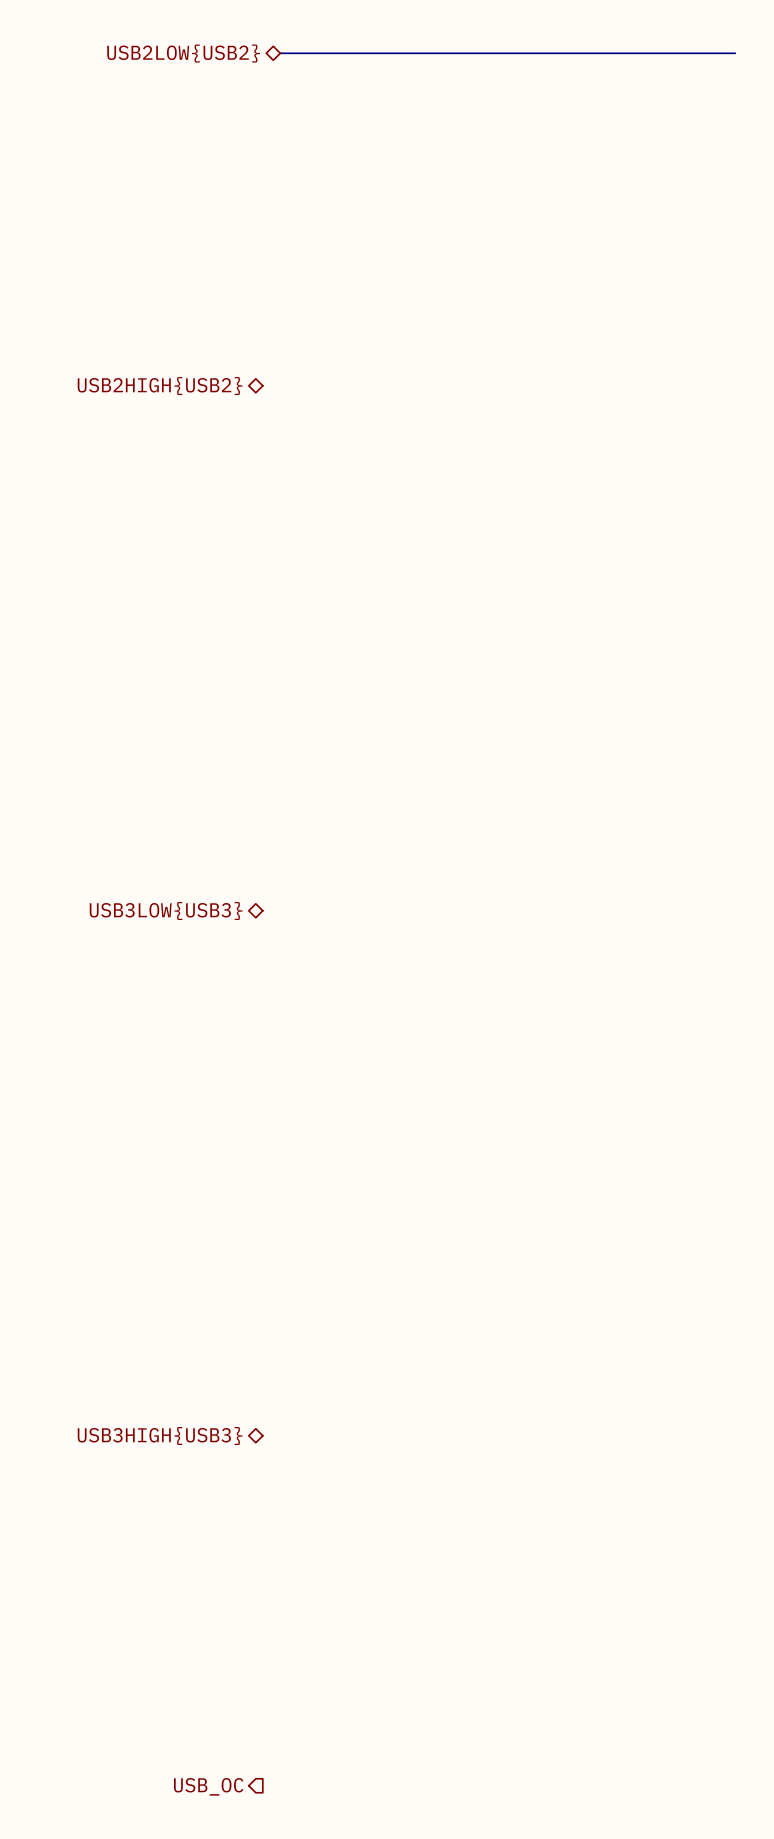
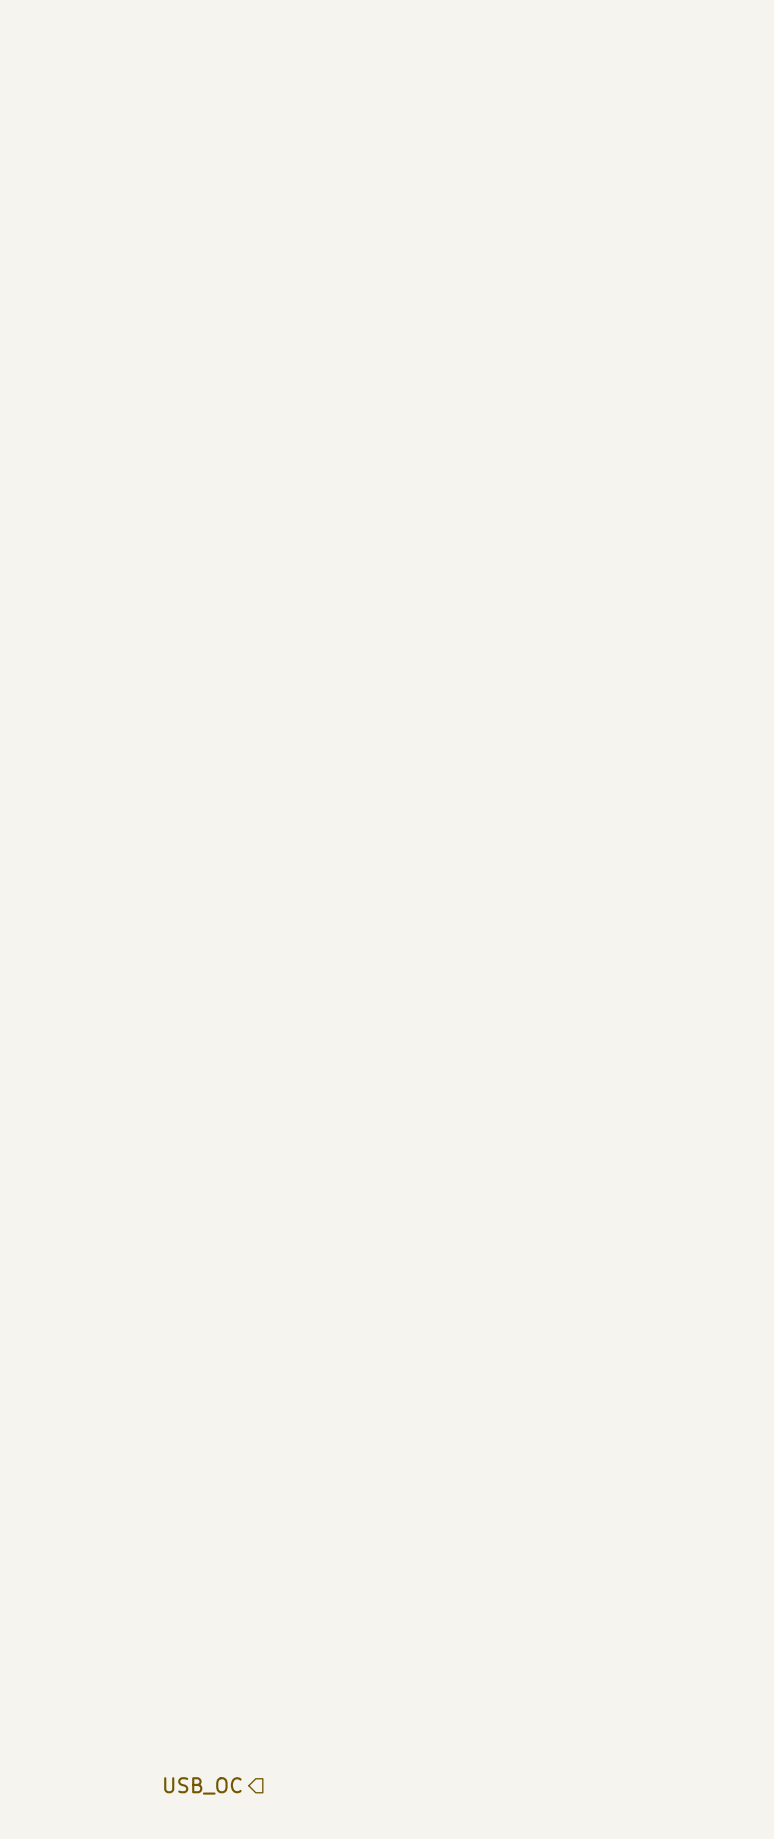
hierarchical label: USB2LOW{USB2} (183, 53) -> none
bus: (280, 53) (735, 53) -> none
hierarchical label: USB2HIGH{USB2} (160, 386) -> none
hierarchical label: USB3LOW{USB3} (166, 911) -> none
hierarchical label: USB3HIGH{USB3} (160, 1436) -> none

